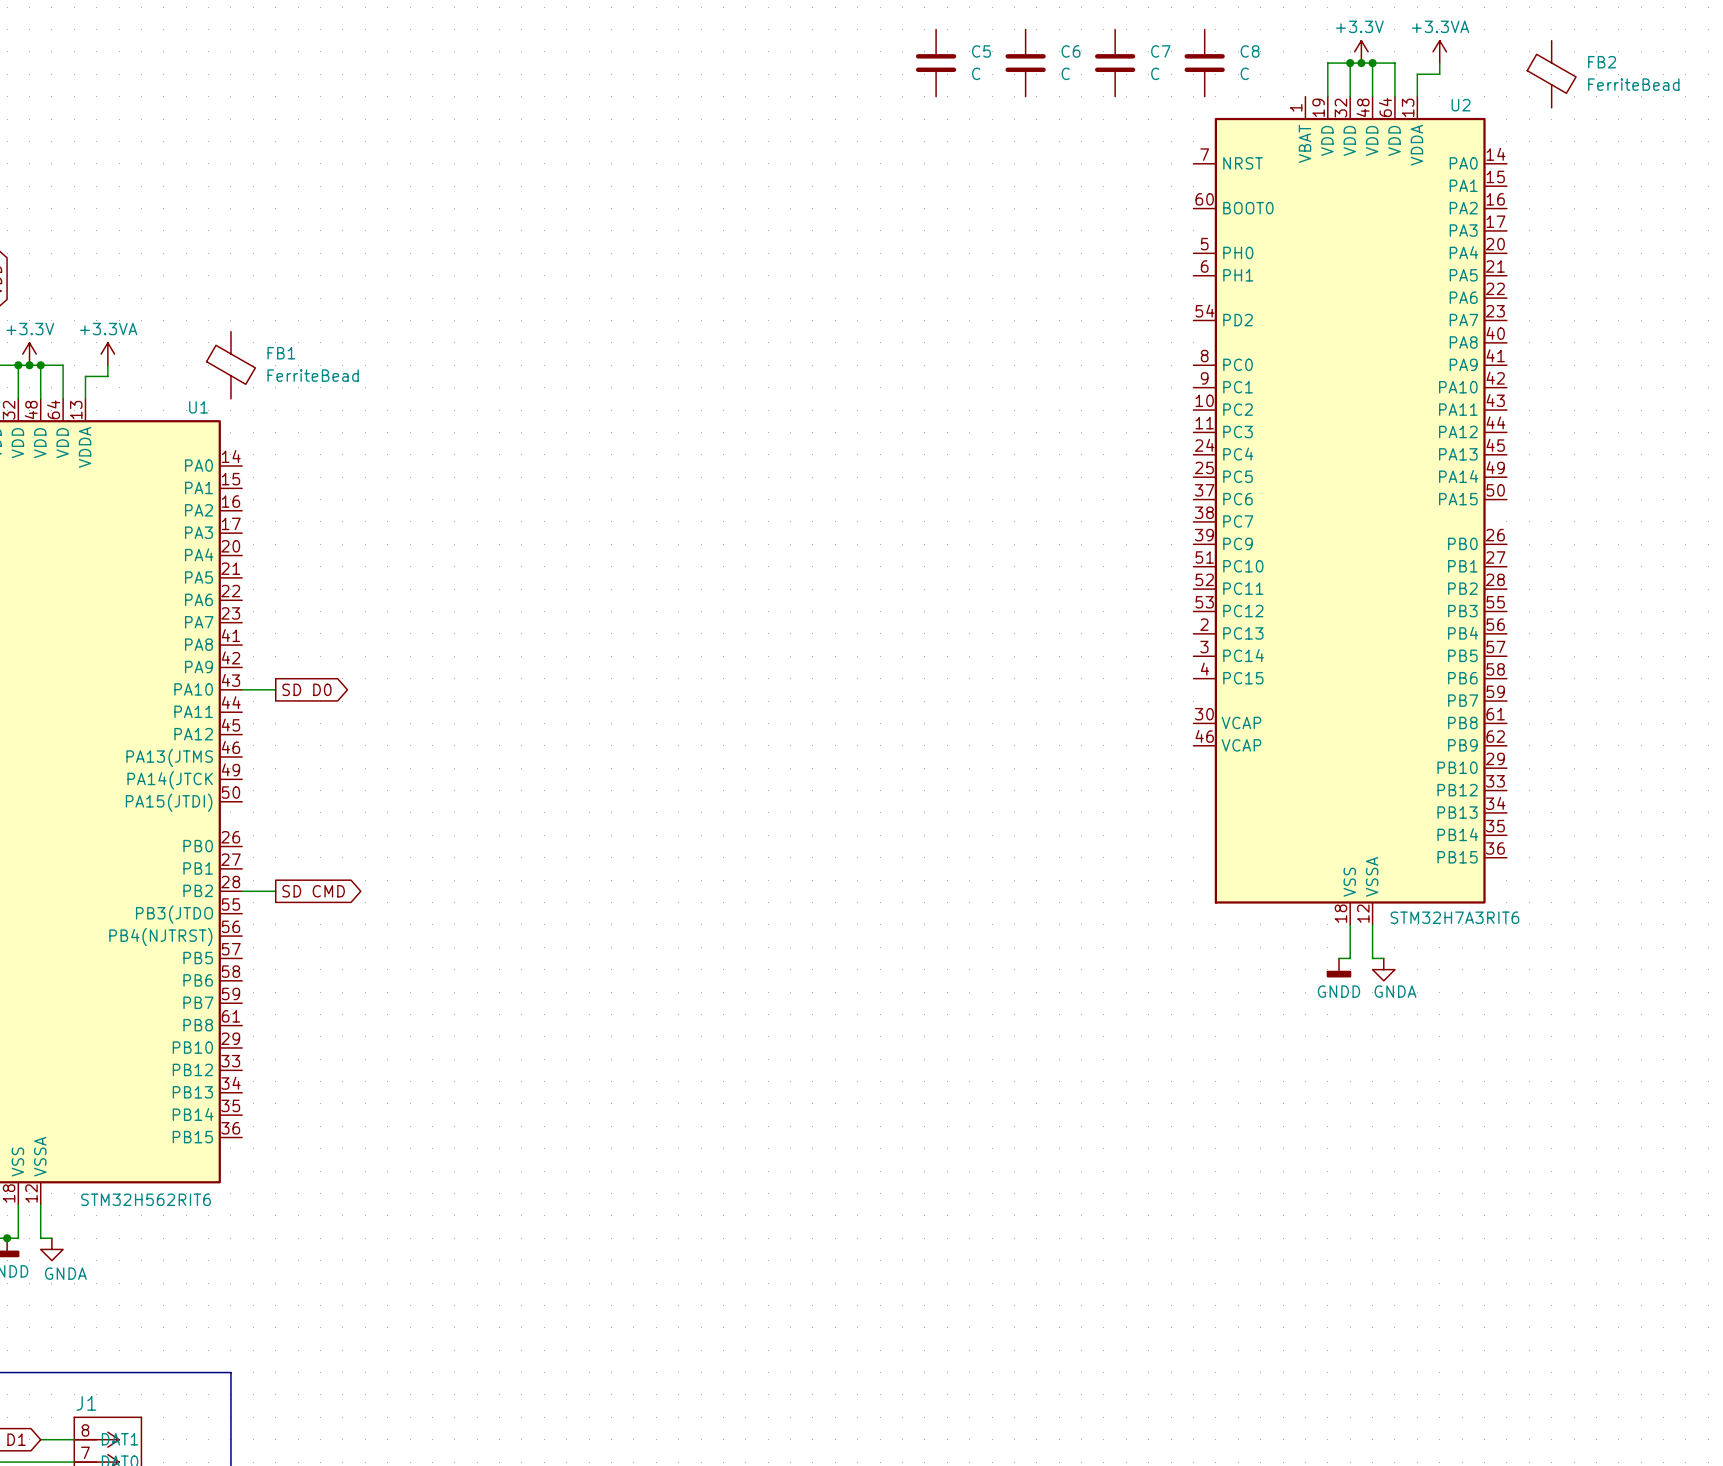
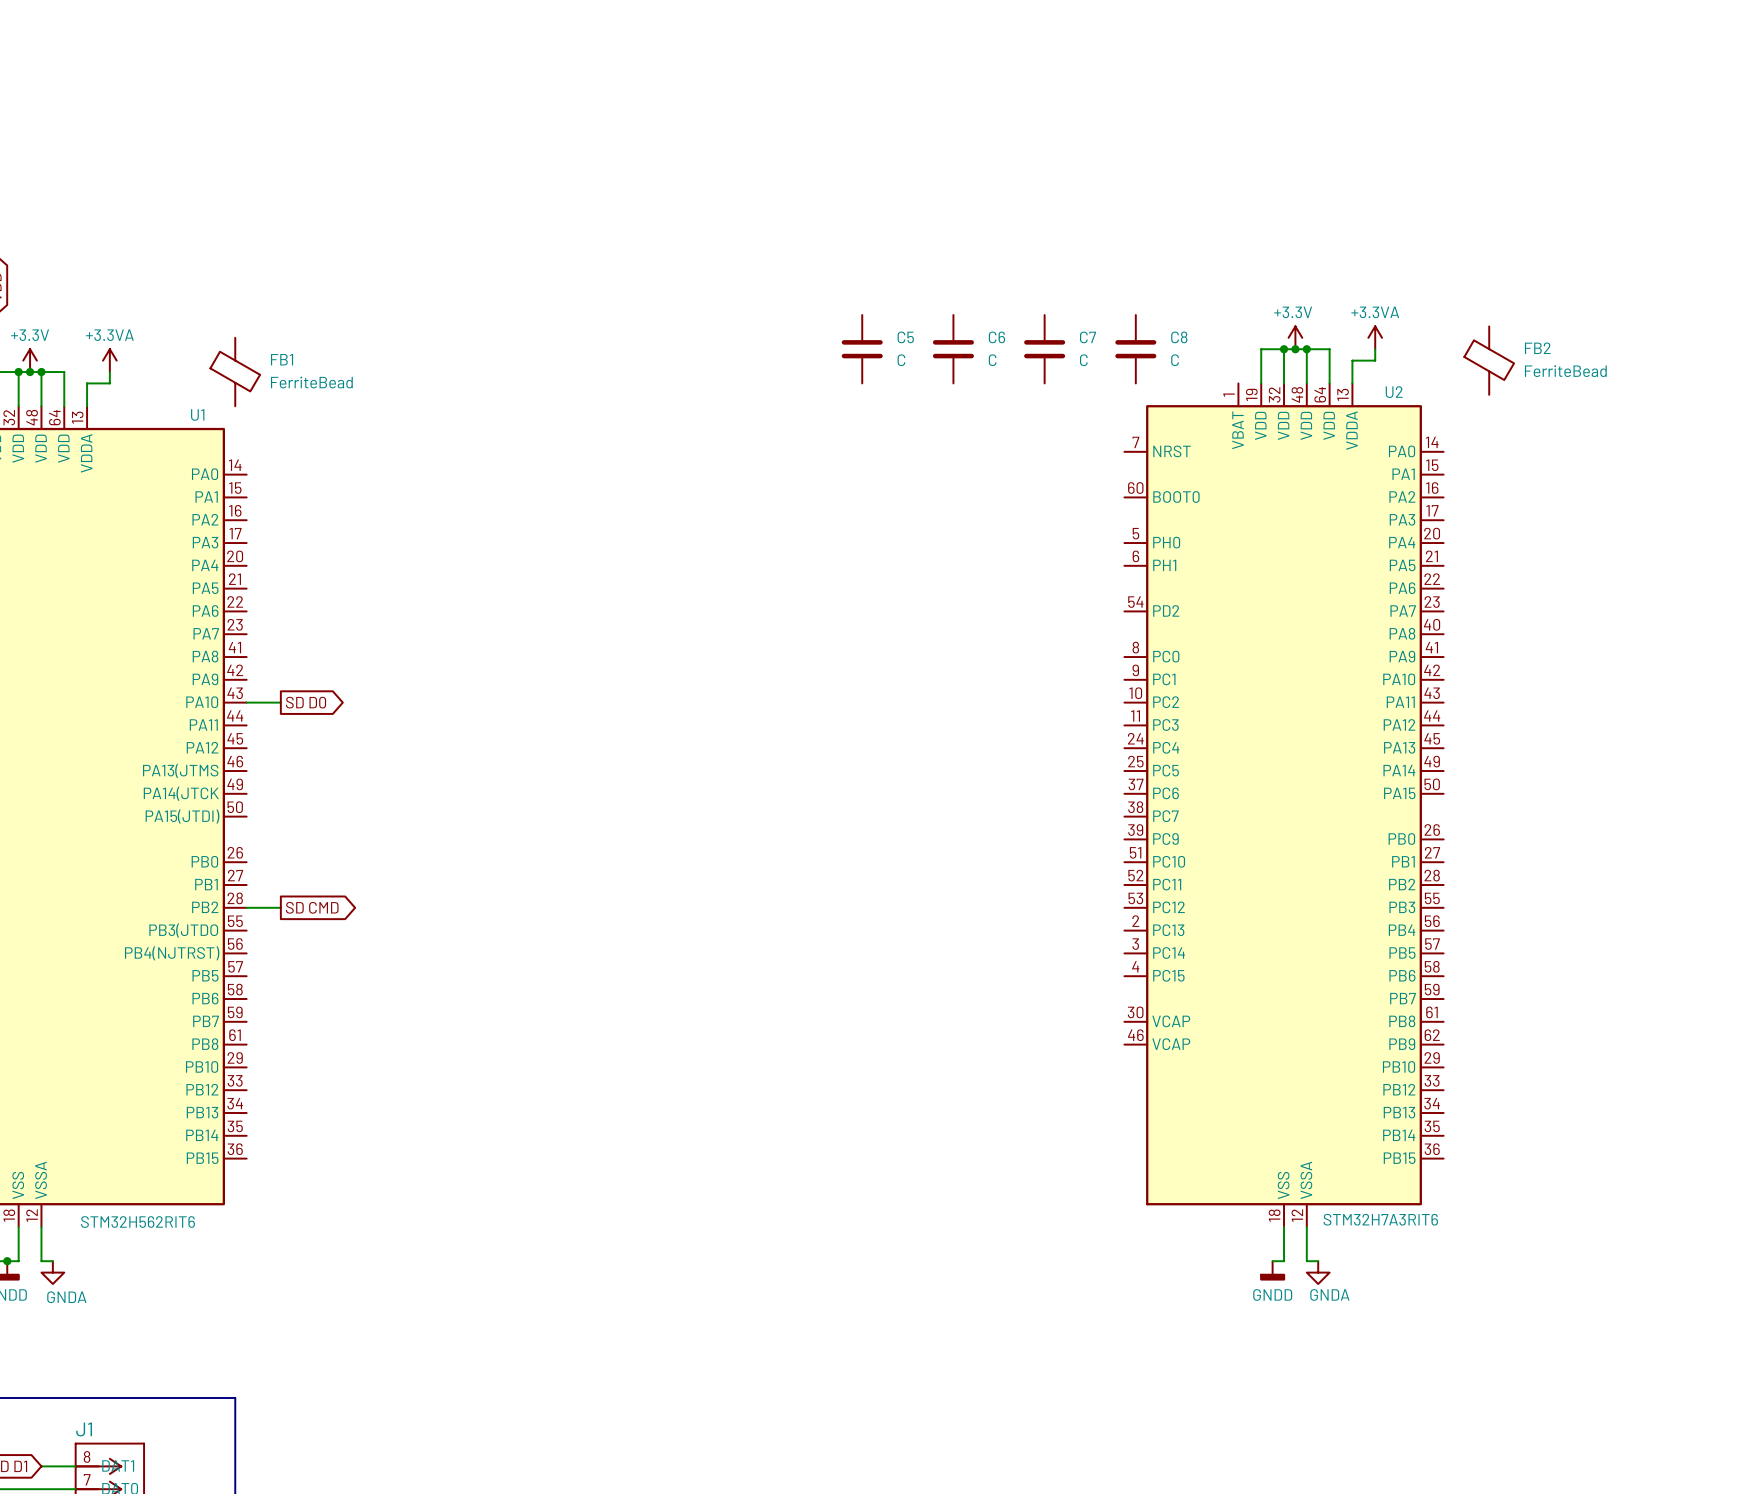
power symbol: +3.3V (1361, 51) -> none
power symbol: +3.3VA (1439, 51) -> none
C5 position: (936, 63) -> (862, 349)
C6 position: (1025, 63) -> (953, 349)
C7 position: (1115, 63) -> (1044, 349)
C8 position: (1204, 63) -> (1135, 349)
wire: (1350, 63) (1350, 96) -> none
junction: (1350, 63) -> none
junction: (1361, 63) -> none
wire: (1372, 63) (1372, 96) -> none
junction: (1372, 63) -> none
wire: (1439, 63) (1439, 74) (1417, 74) (1417, 96) -> none
FB2 position: (1551, 74) -> (1489, 360)
wire: (1327, 96) (1327, 63) (1394, 63) (1394, 96) -> none
power symbol: none -> +3.3V (1295, 337)
power symbol: none -> +3.3VA (1375, 337)
junction: none -> (1284, 349)
junction: none -> (1295, 349)
junction: none -> (1306, 349)
U2 position: (1350, 510) -> (1284, 805)
power symbol: GNDD (1338, 967) -> none
power symbol: GNDA (1383, 969) -> none
wire: none -> (1284, 1227) (1284, 1261) (1272, 1261)
wire: none -> (1306, 1227) (1306, 1261) (1318, 1261)
power symbol: none -> GNDD (1272, 1270)
power symbol: none -> GNDA (1318, 1272)

